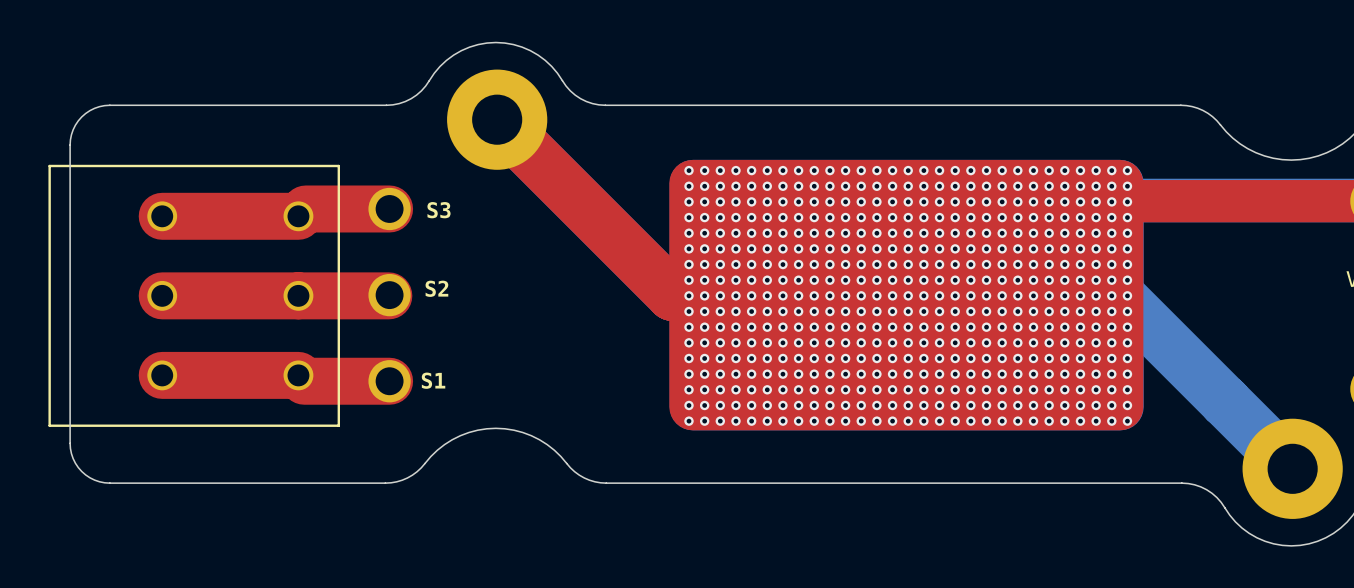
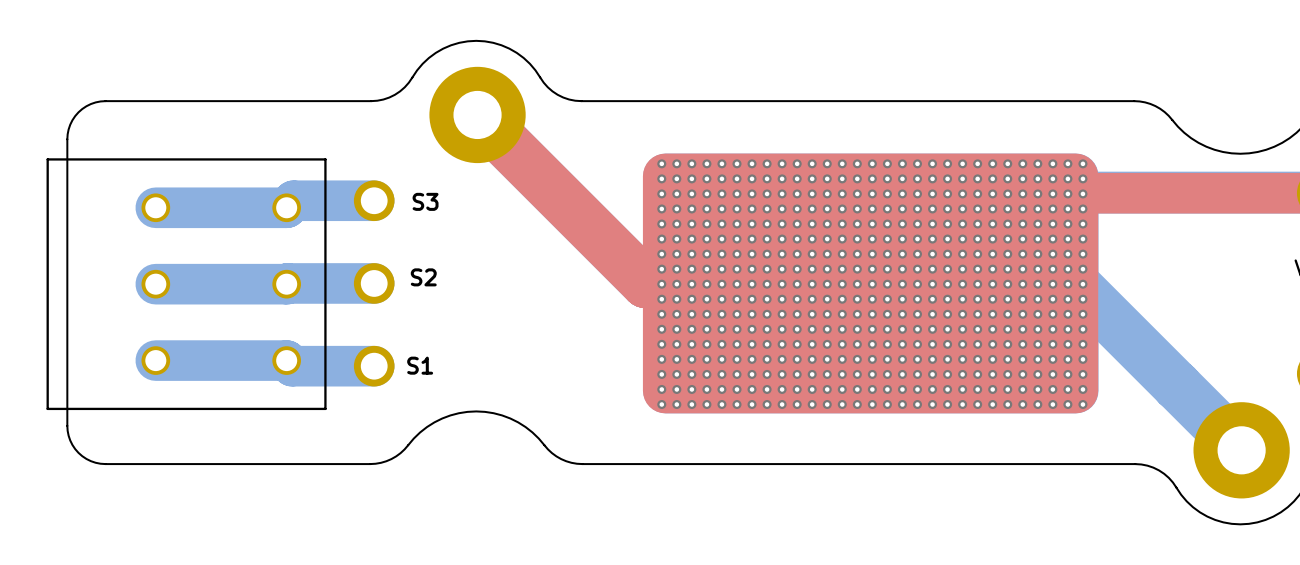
top track: (389, 208) (305, 208) (298, 216) (162, 216) -> none
top track: (389, 295) (162, 295) -> none
top track: (162, 375) (298, 375) (304, 381) (389, 381) -> none

